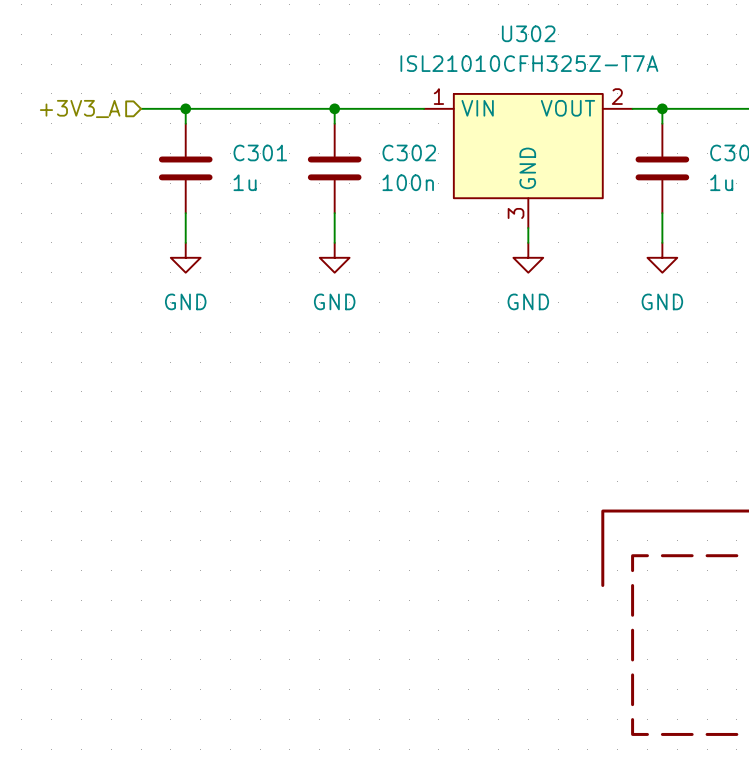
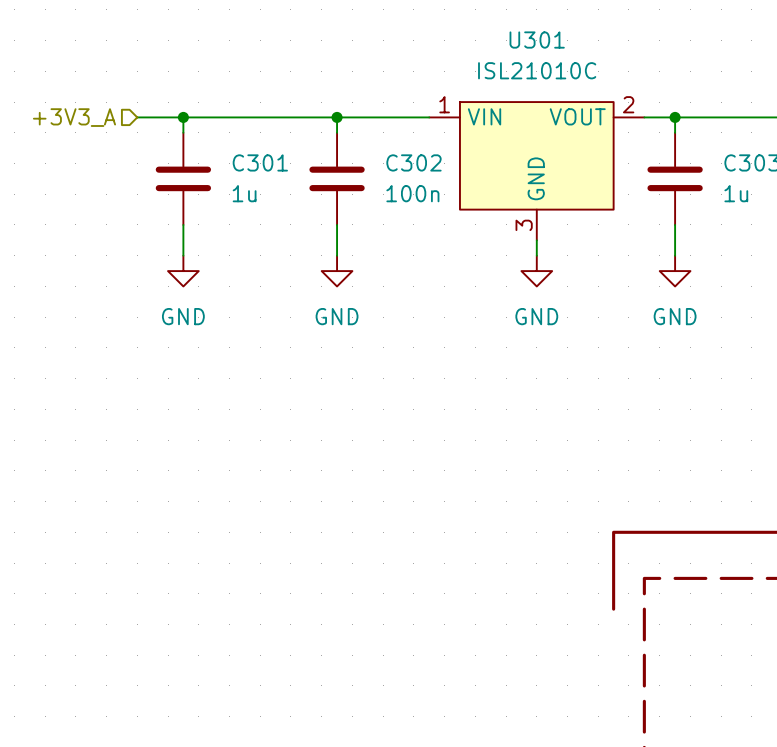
U302 name: U302 (528, 33) -> U301 (537, 40)
U302 value: ISL21010CFH325Z-T7A (529, 63) -> ISL21010C (537, 70)

